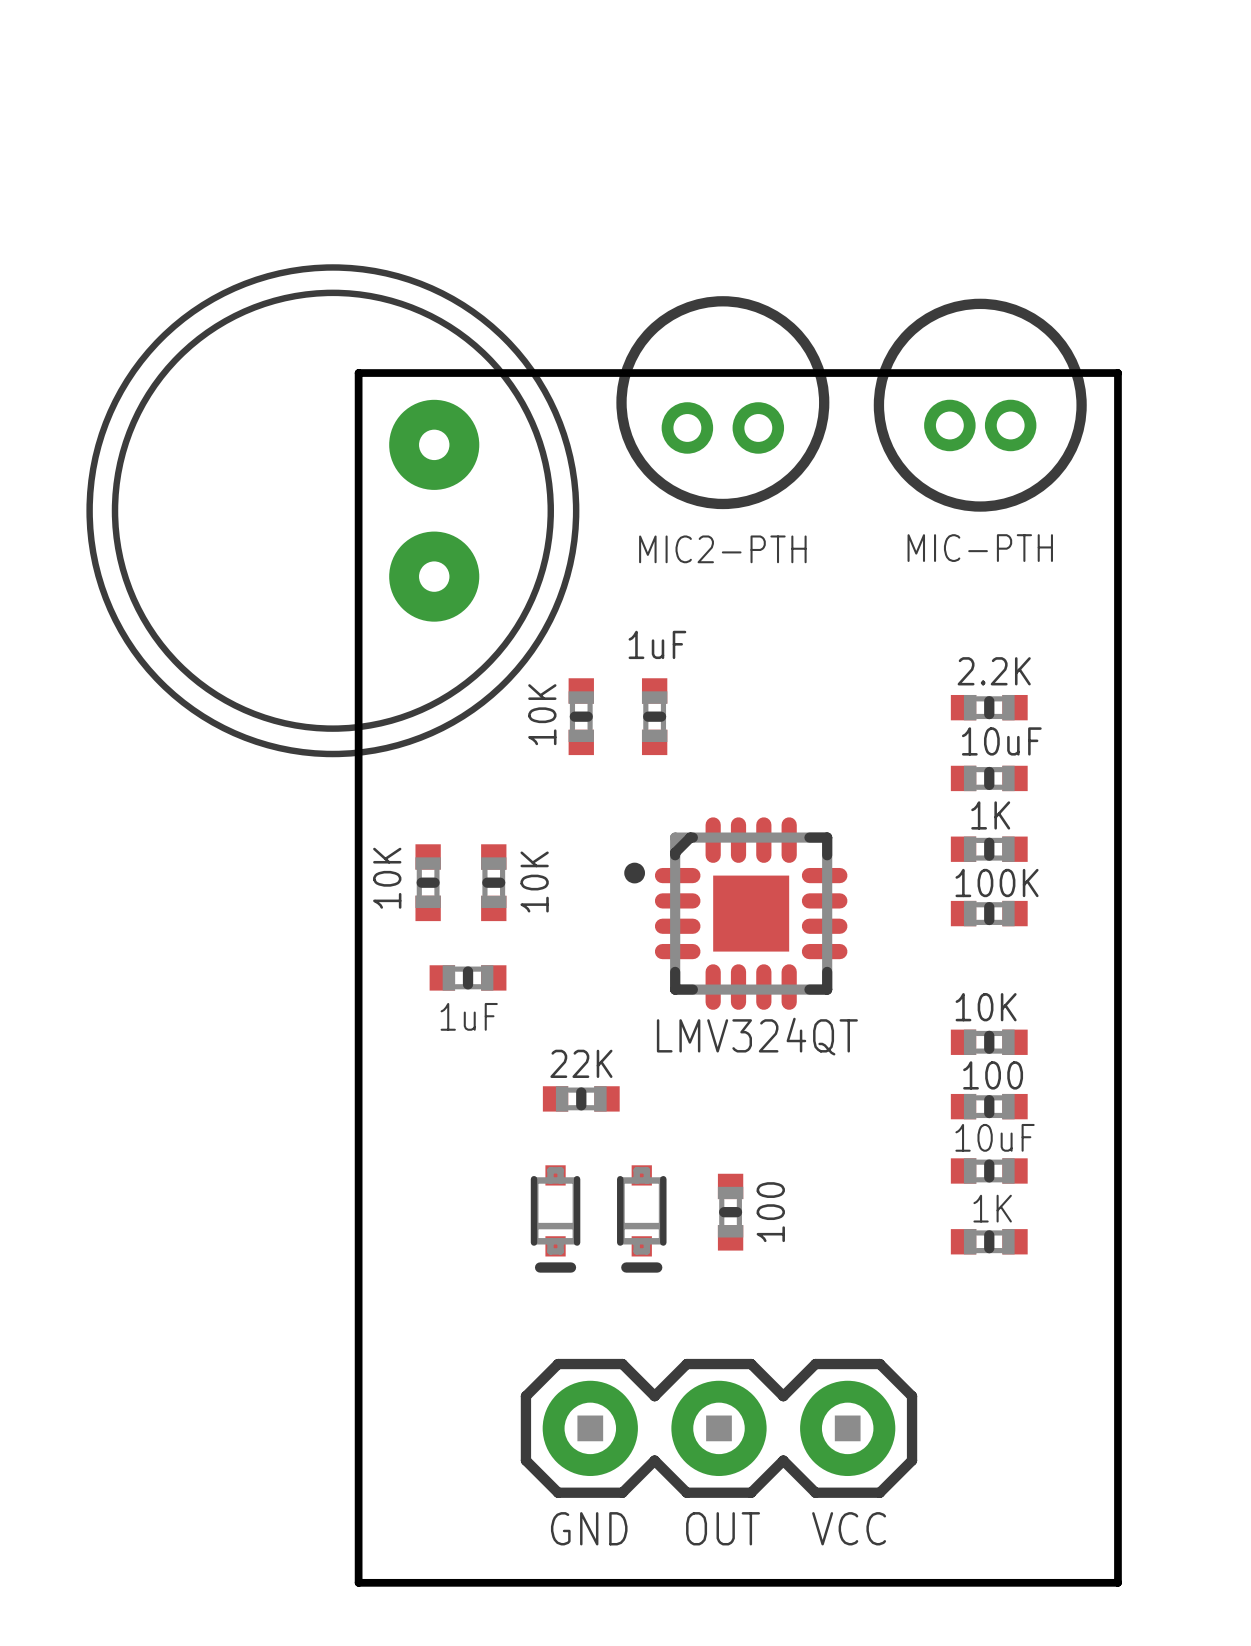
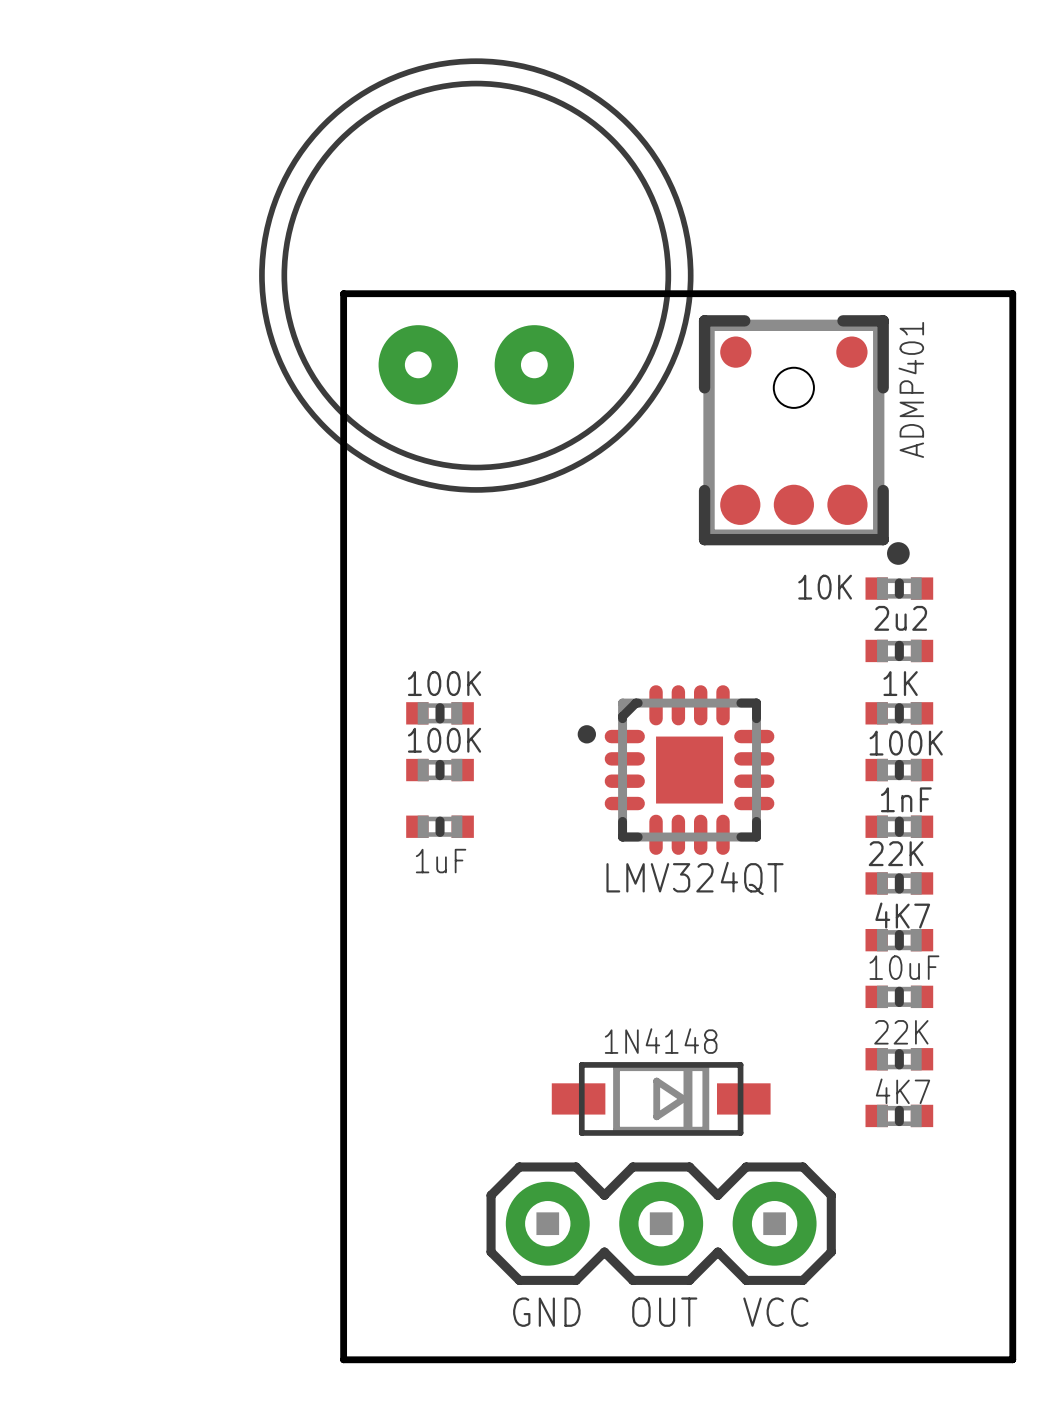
part: MIC2-PTH (722, 402) -> none
part: MIC-PTH (980, 405) -> none
part rotation: 0° (332, 510) -> 90° clockwise (476, 275)
part: none -> ADMP401 (804, 440)
part value: 2.2K (994, 671) -> 10K (825, 587)
part: 10K (581, 716) -> none
part: 1uF (654, 716) -> none
part value: 10uF (1001, 741) -> 2u2 (900, 618)
part: none -> 100K (440, 713)
part: 10K (428, 882) -> none
part: 10K (493, 882) -> none
part: none -> 100K (440, 770)
part: none -> 1nF (899, 826)
part value: 10K (986, 1007) -> 22K (896, 853)
part value: 100 (993, 1075) -> 4K7 (902, 915)
part: 22K (581, 1098) -> none
part value: 1K (992, 1208) -> 22K (901, 1032)
part: 100 (730, 1212) -> none
part: (555, 1218) -> none
part: (641, 1218) -> none
part: none -> 1N4148 (661, 1098)
part: none -> 4K7 (899, 1115)

